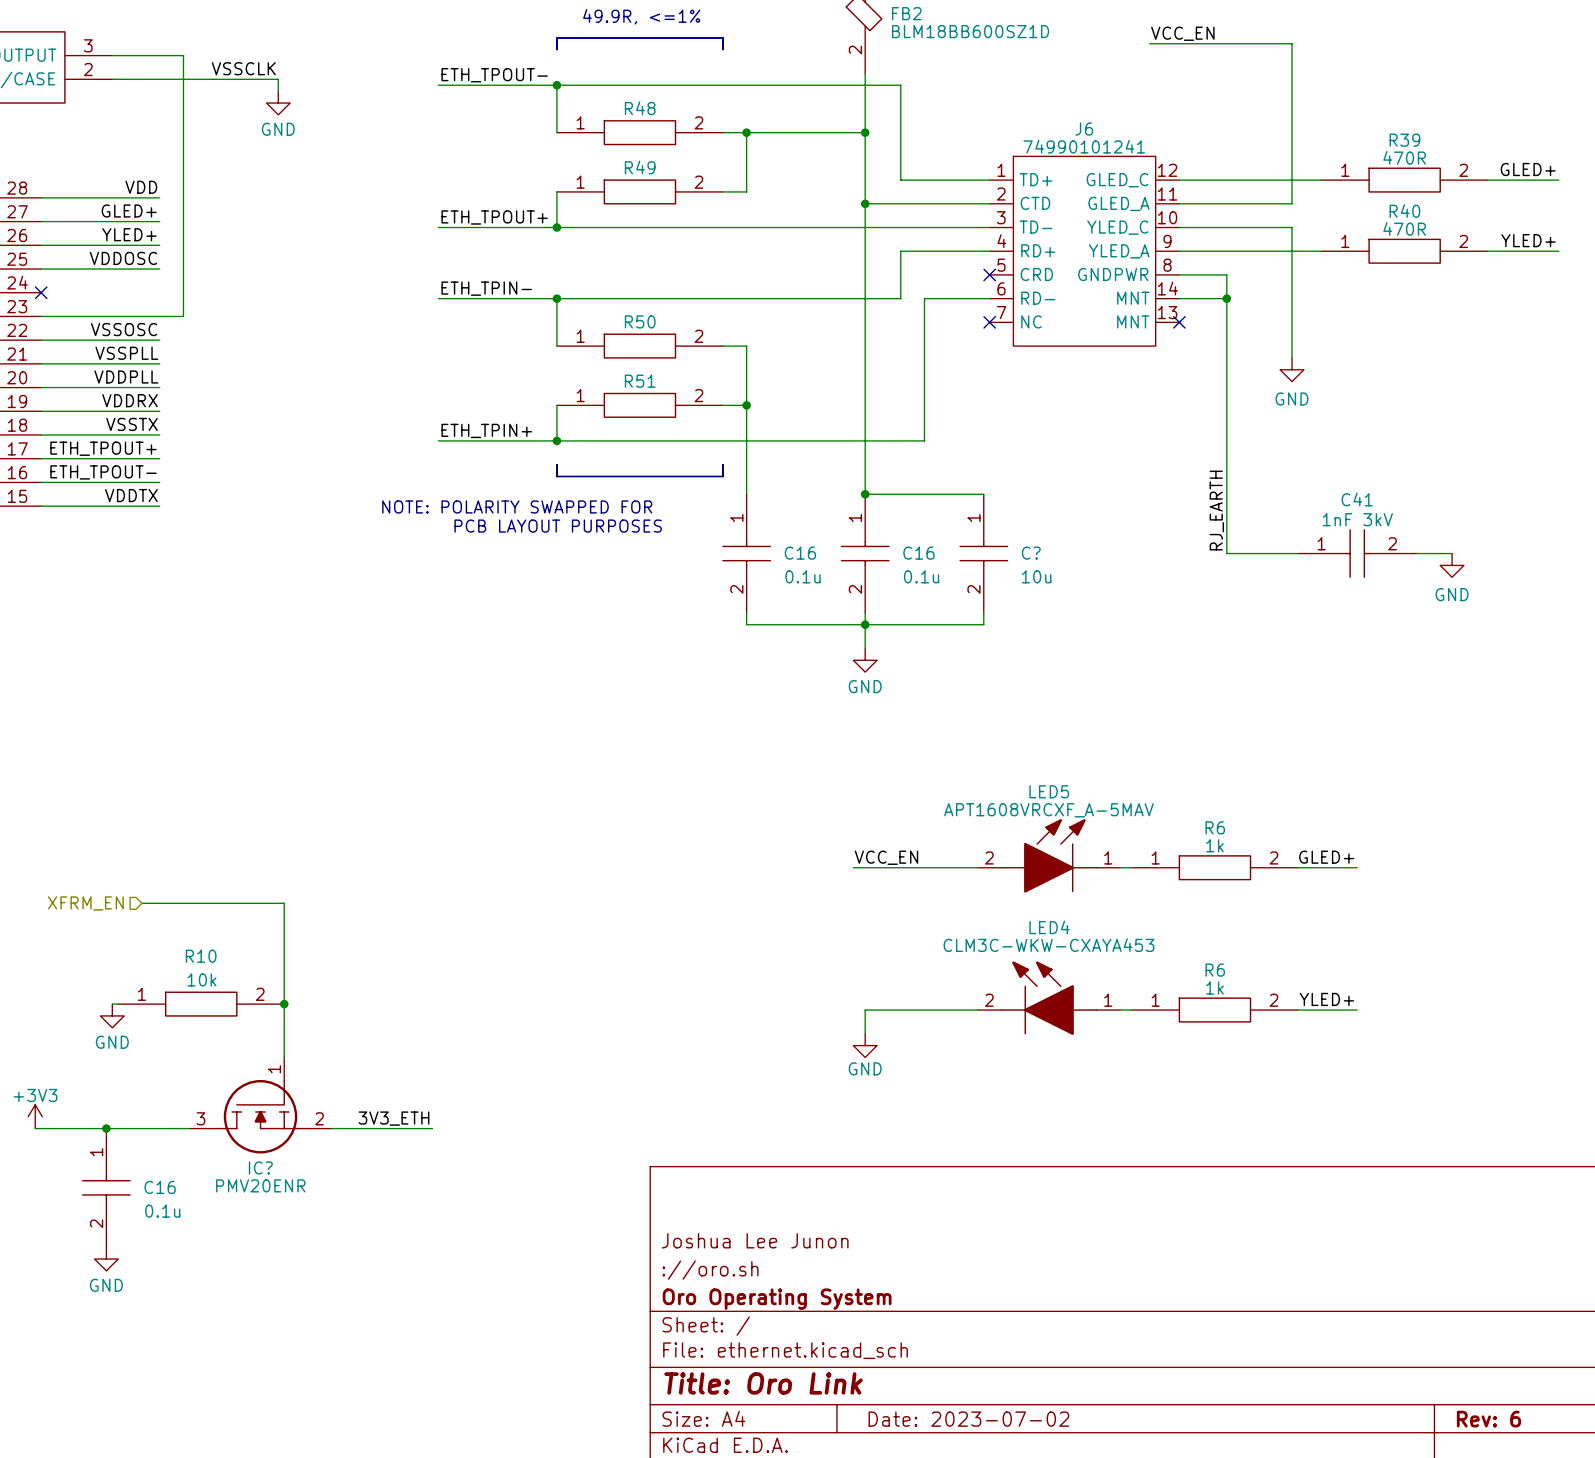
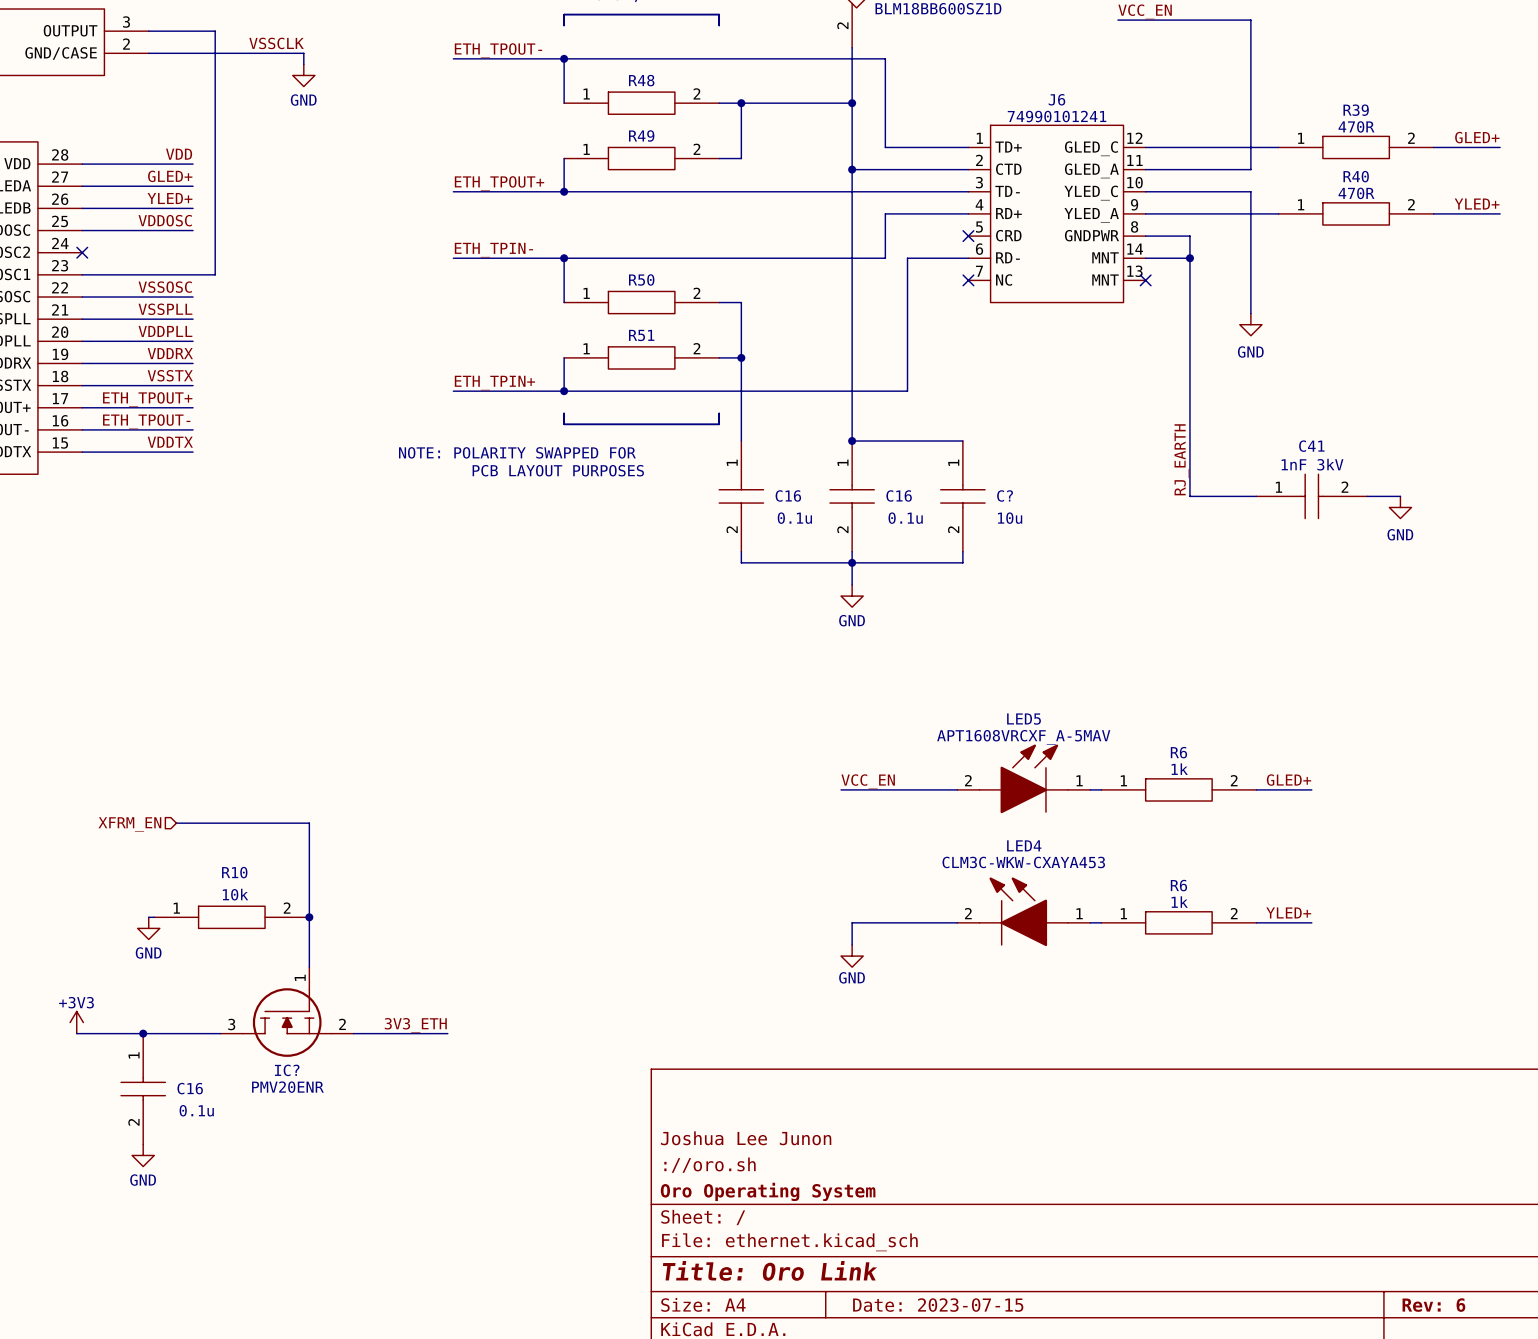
title block: Date: 2023-07-02 (968, 1419) -> Date: 2023-07-15 (938, 1305)

